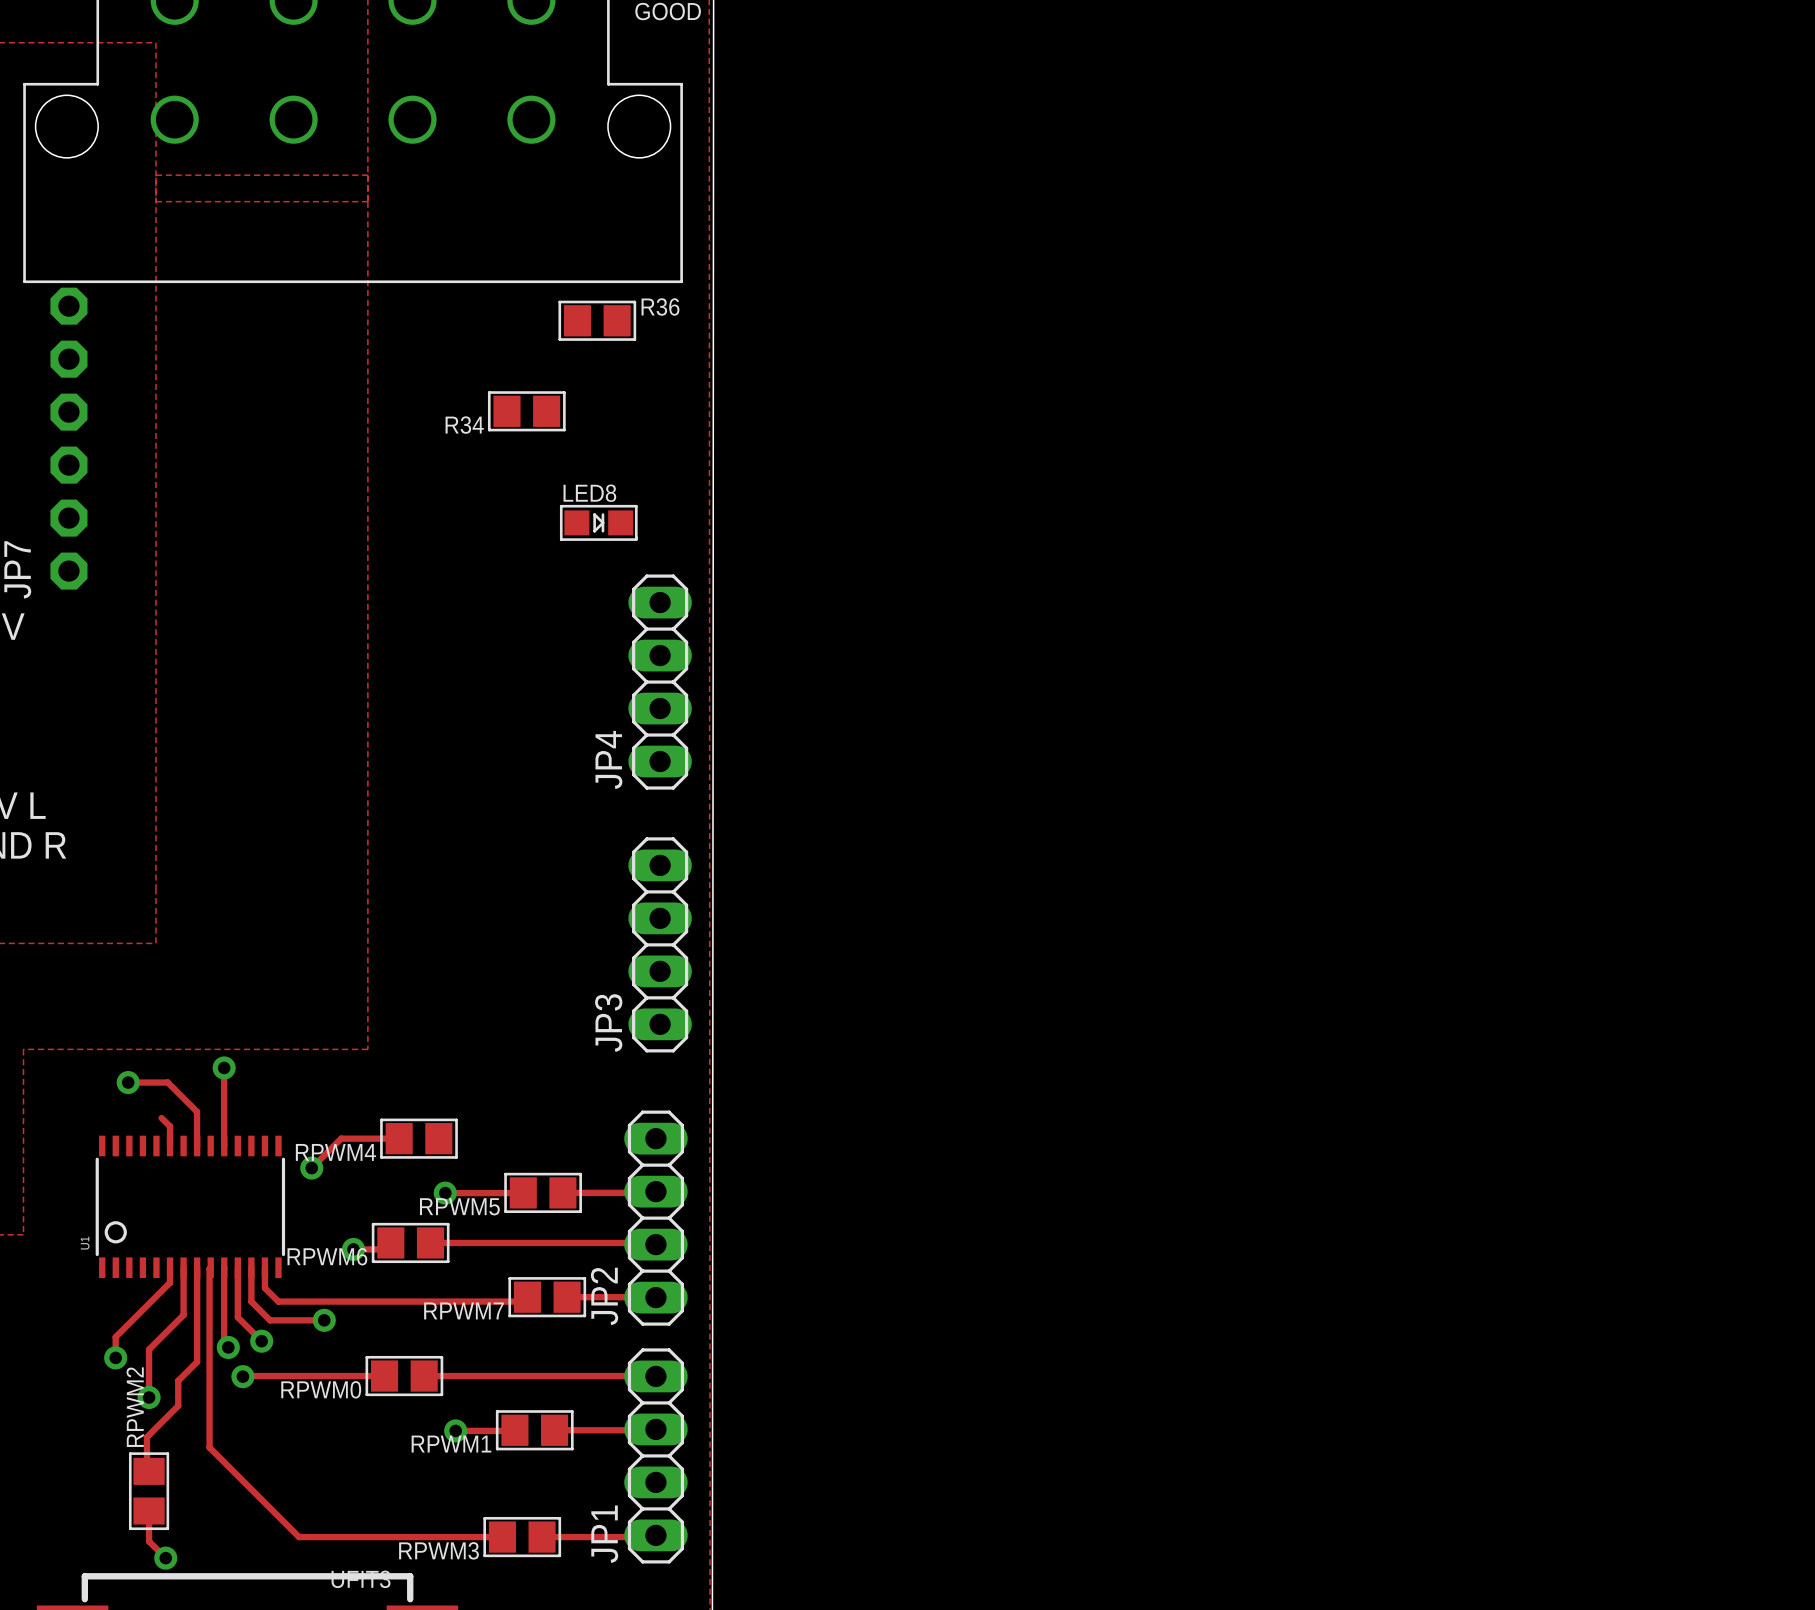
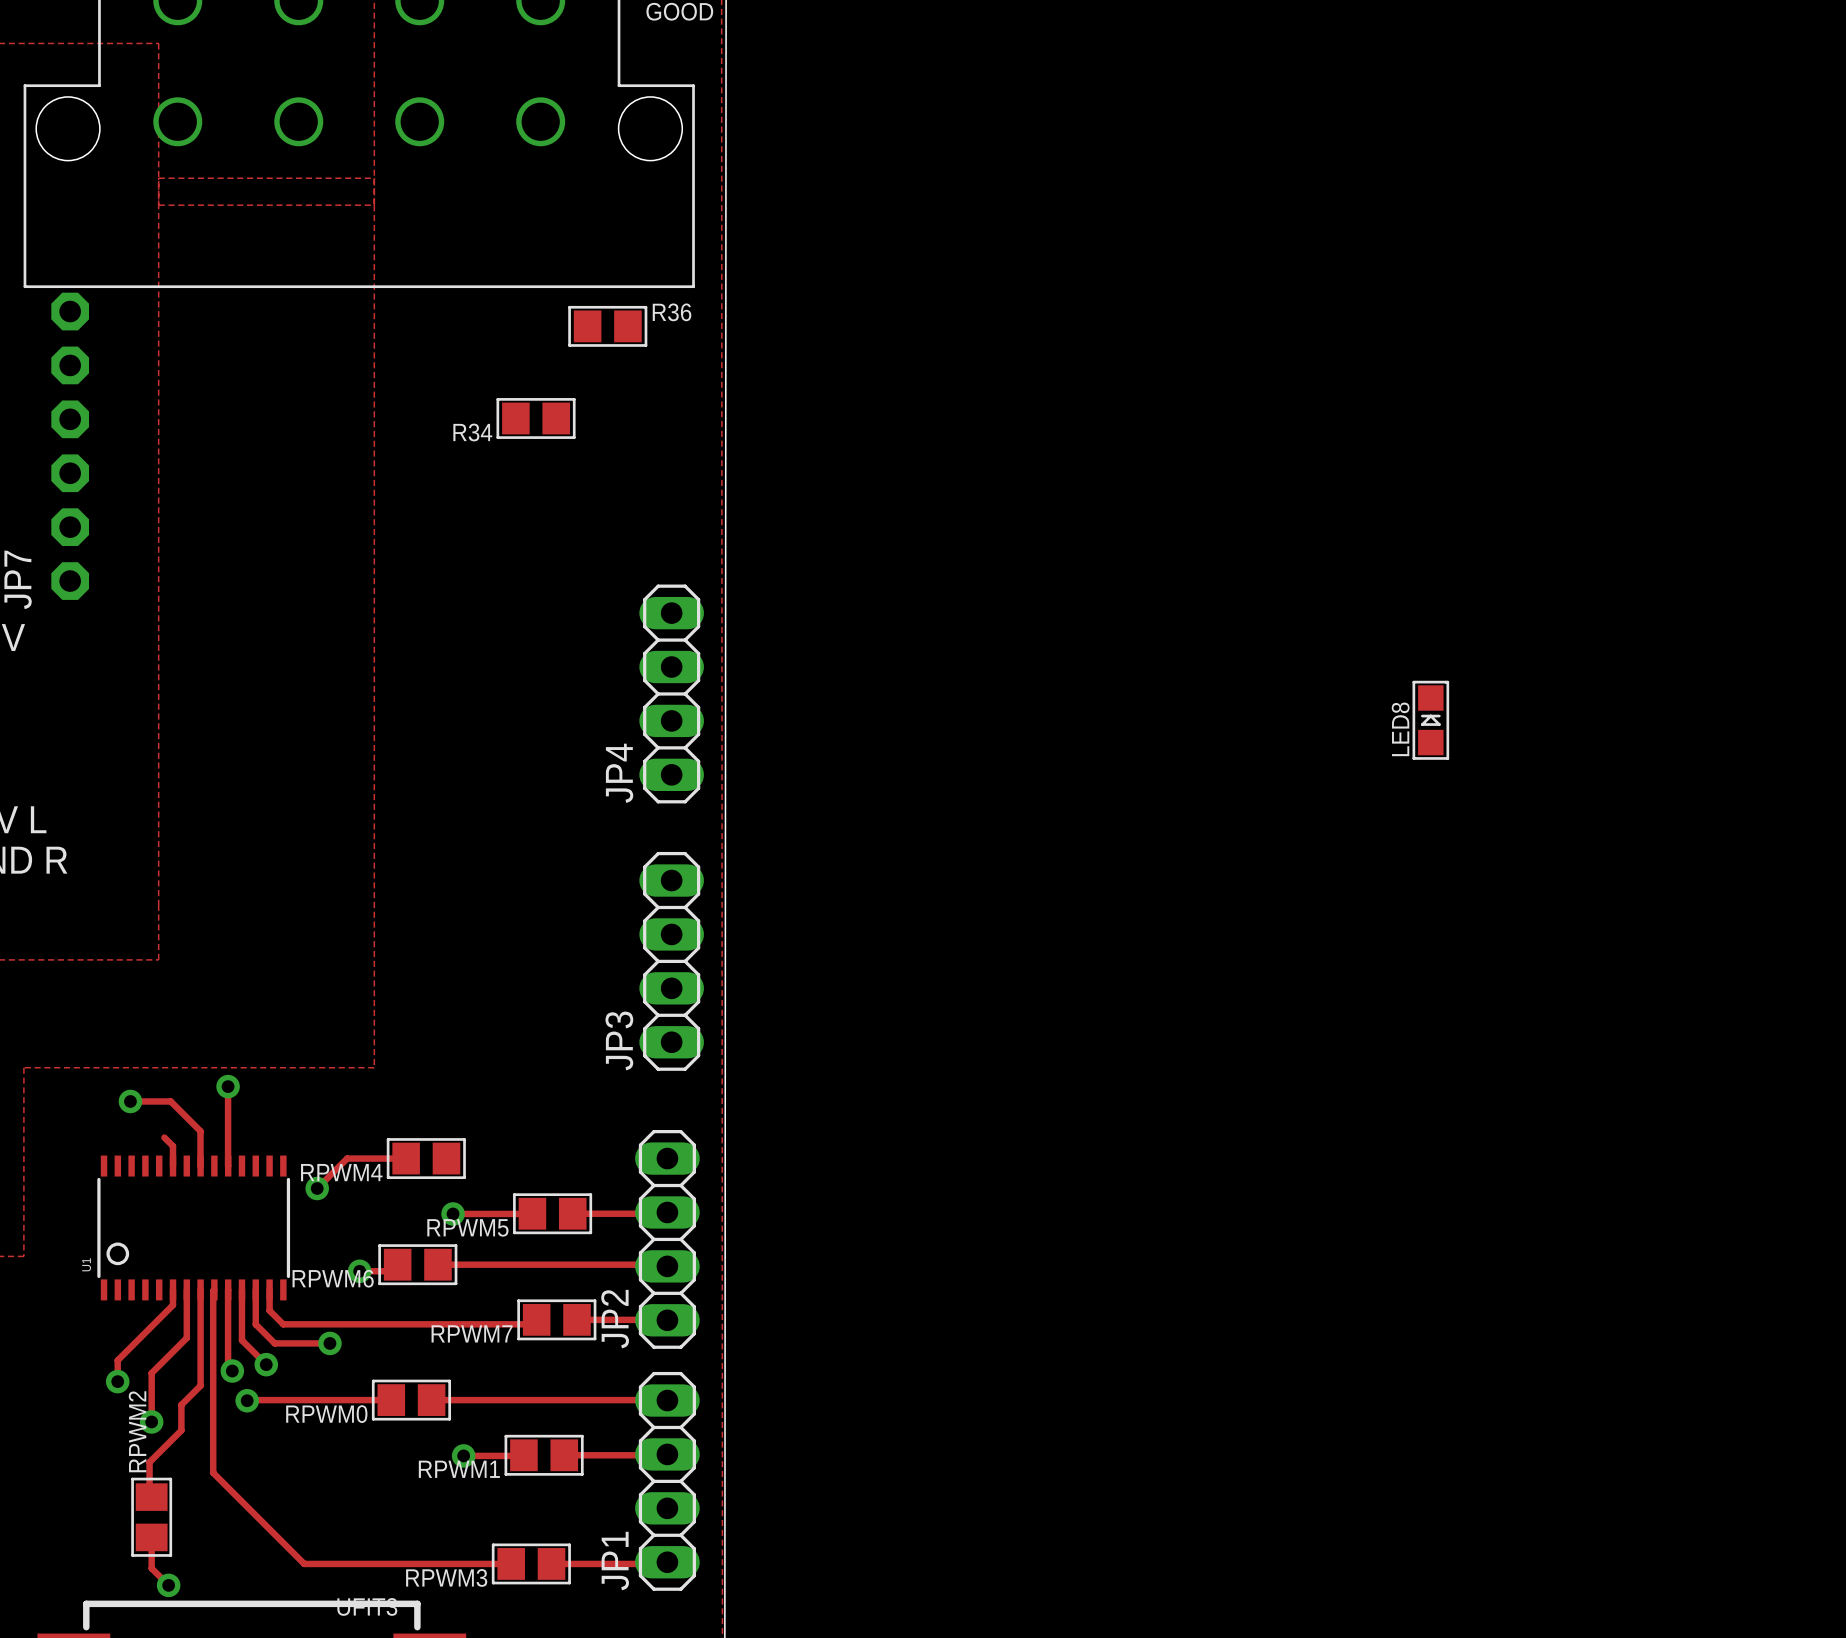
LED8 rotation: 0° (598, 522) -> 90° counterclockwise (1430, 720)
LED8 position: (598, 522) -> (1430, 720)

